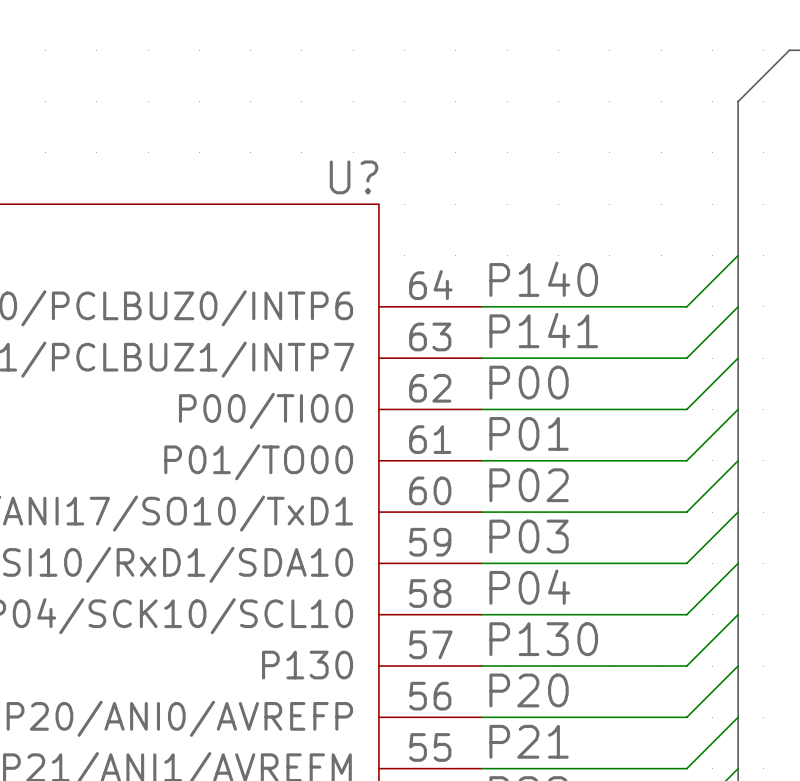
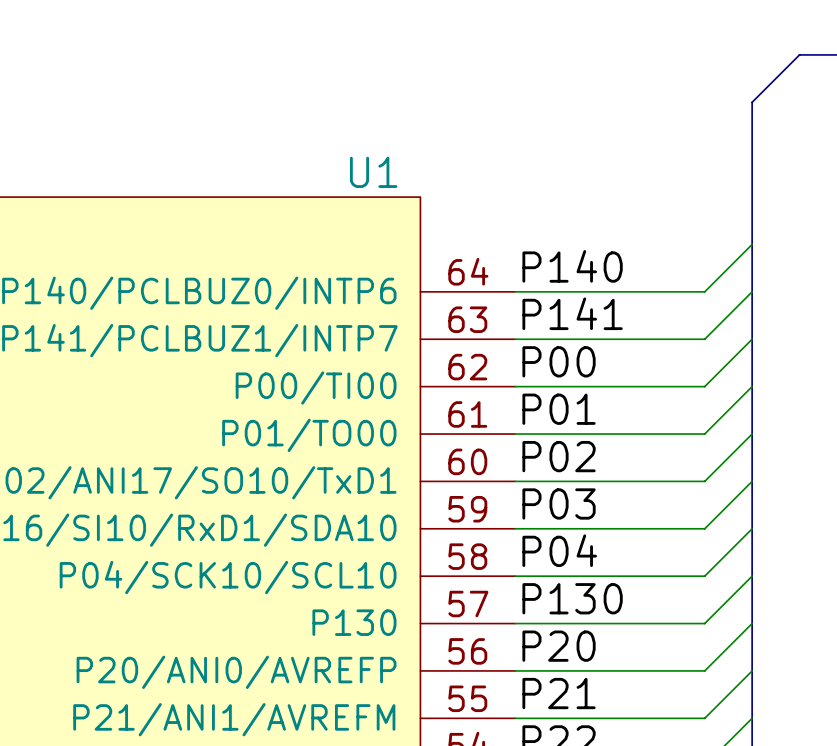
U? name: U? (354, 177) -> U1 (373, 172)

